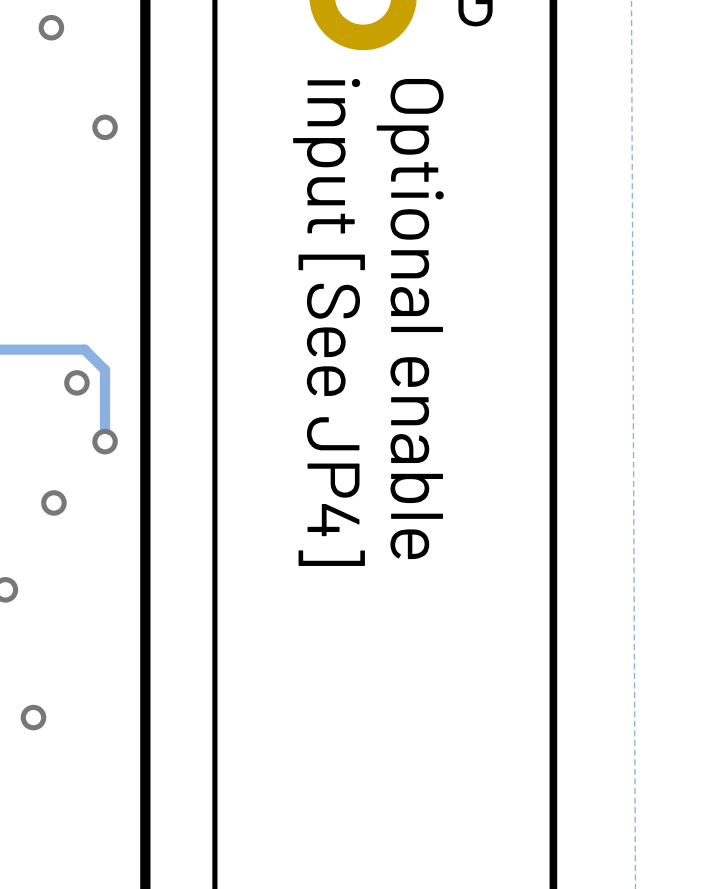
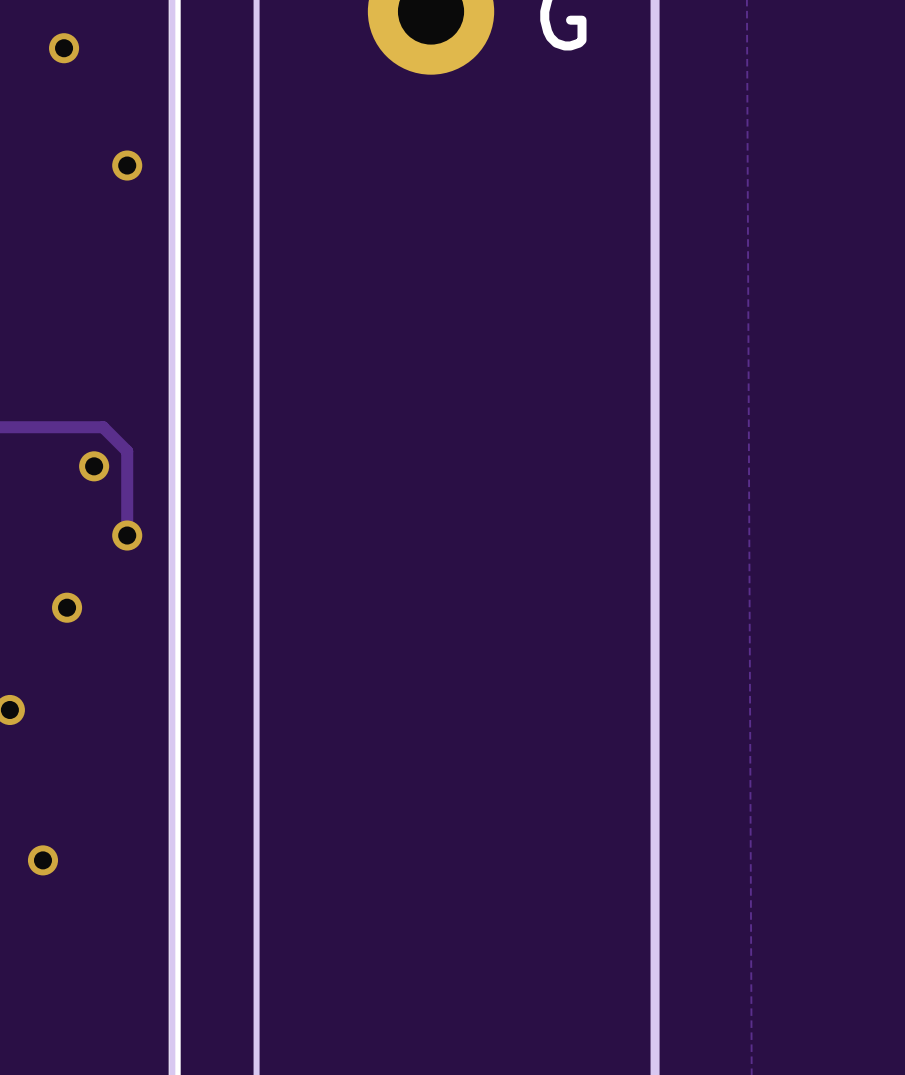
text: Optional enable (410, 319) -> none
text: input [See JP4] (329, 322) -> none

